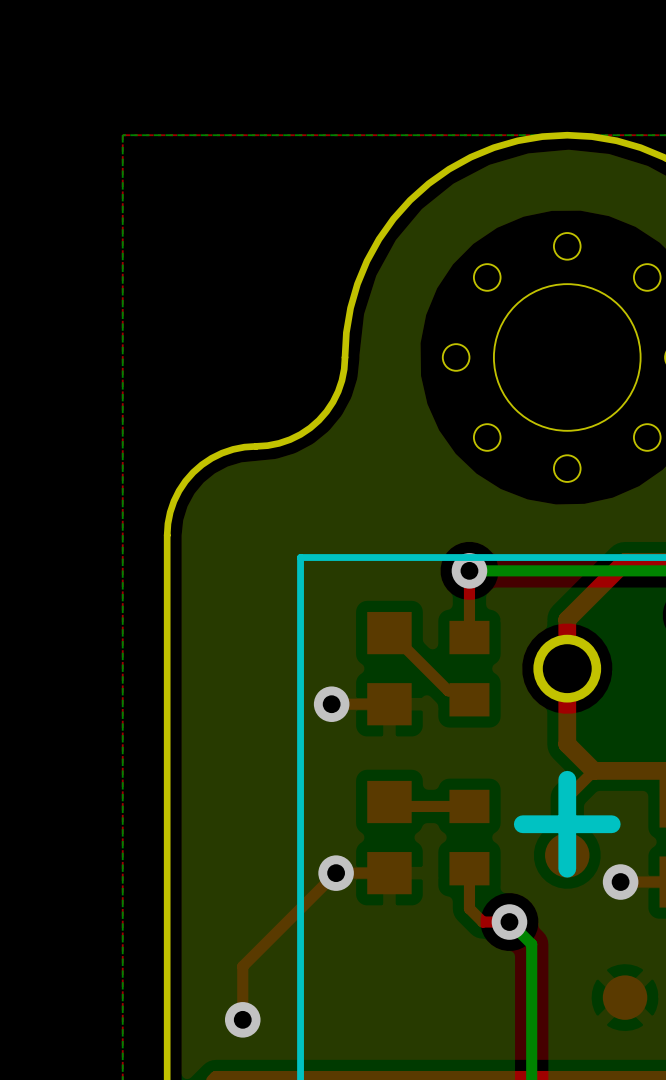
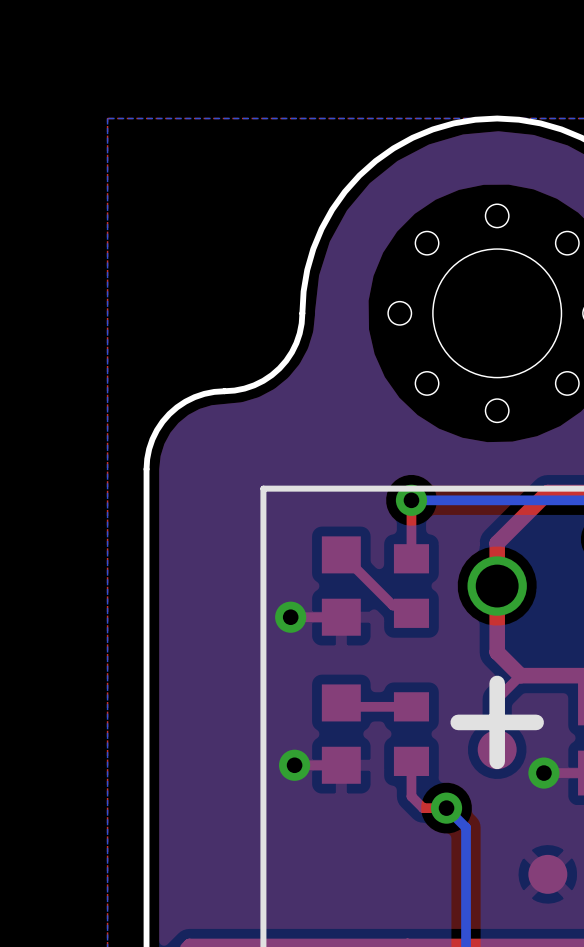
top track: (336, 873) (242, 966) (242, 1019) -> none
via: (242, 1019) -> none

